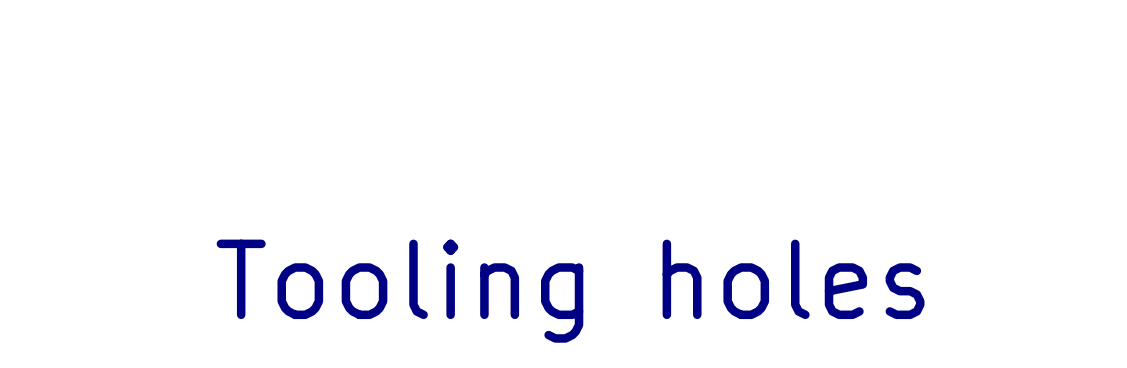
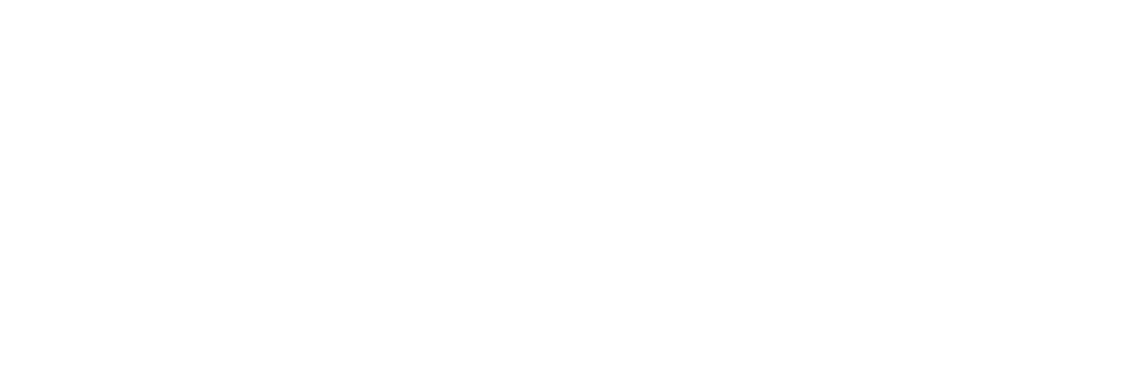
text: Tooling holes (570, 291) -> none

